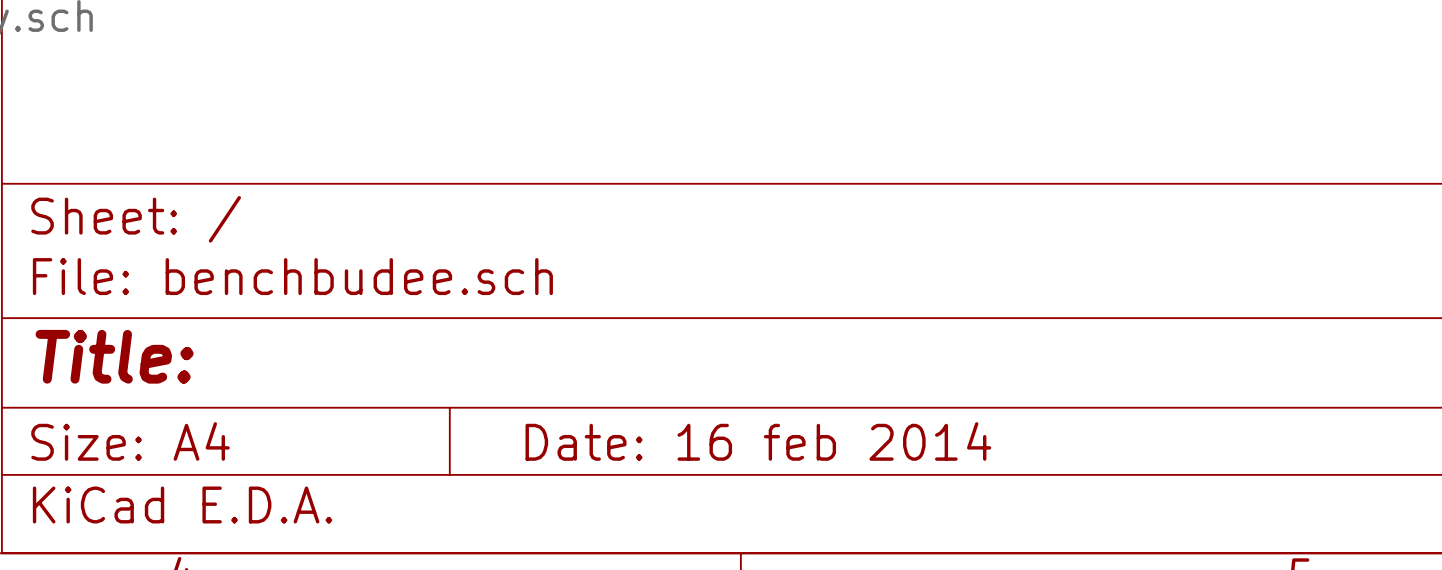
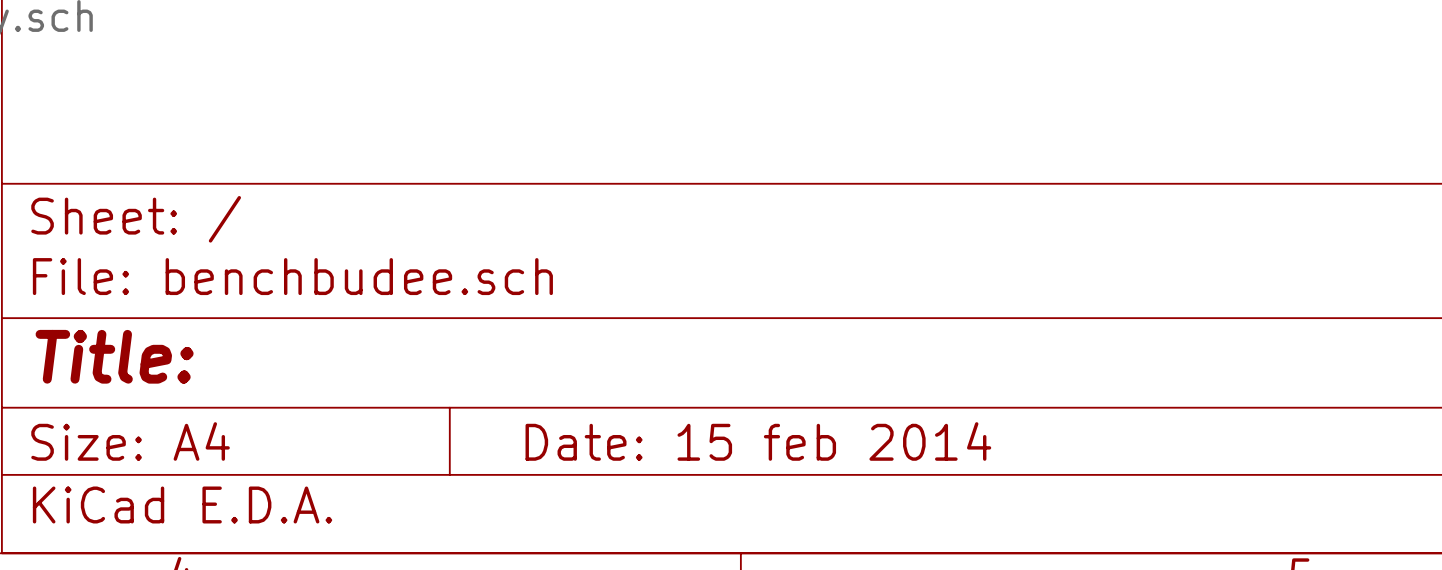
title block: Date: 16 feb 2014 (758, 441) -> Date: 15 feb 2014 (758, 441)

